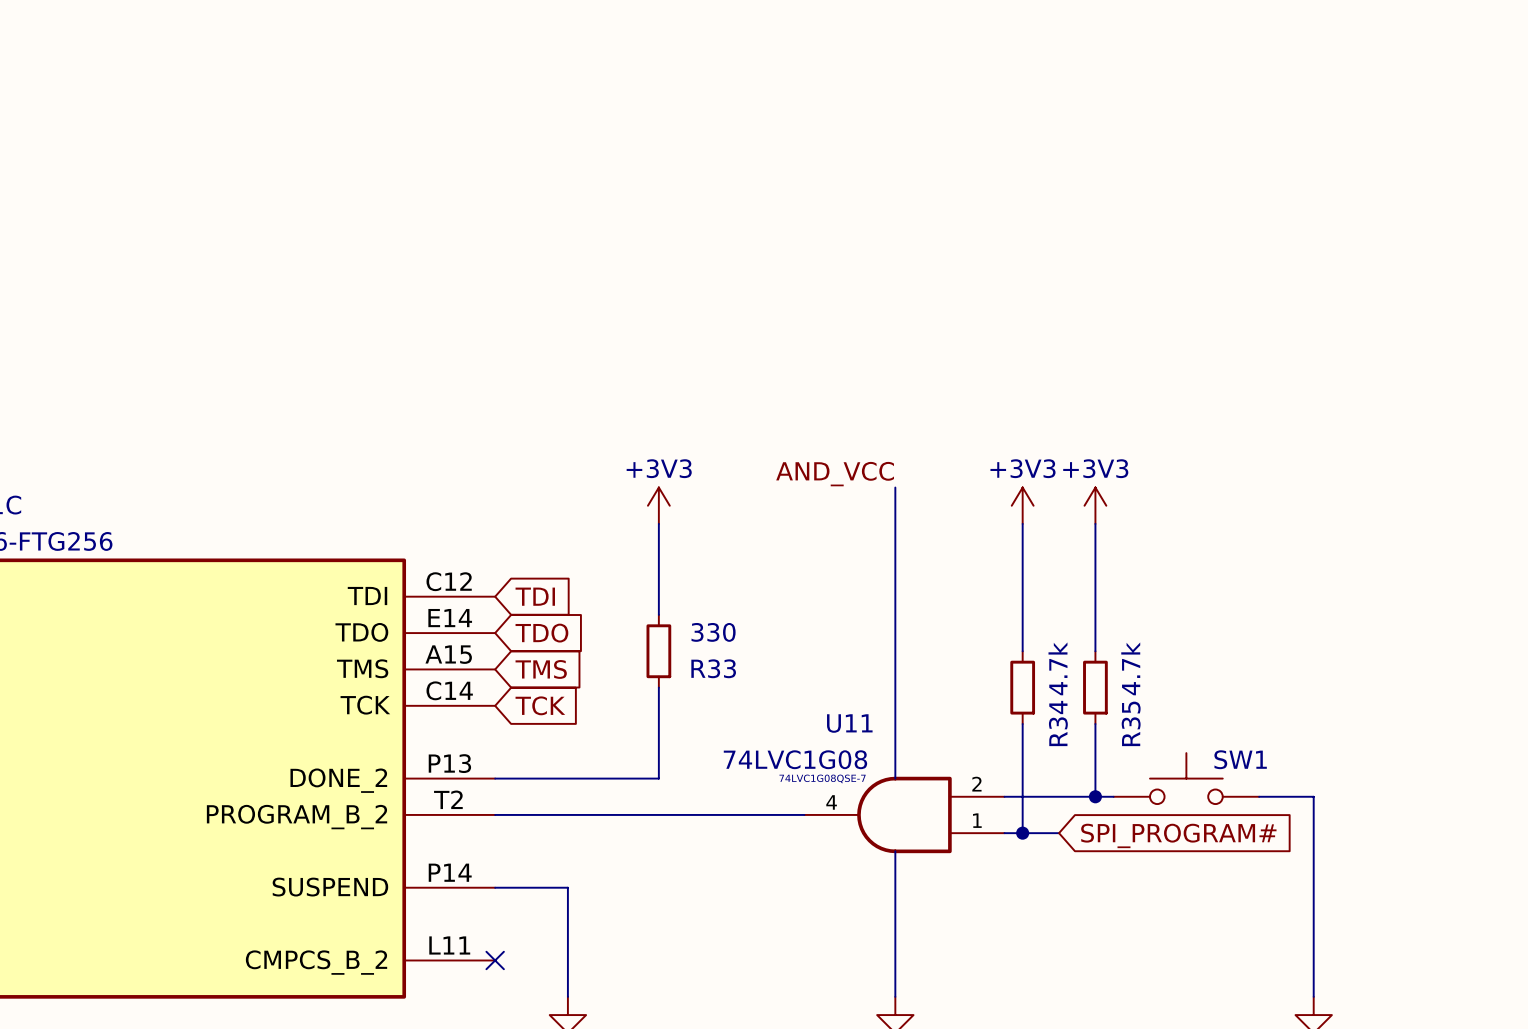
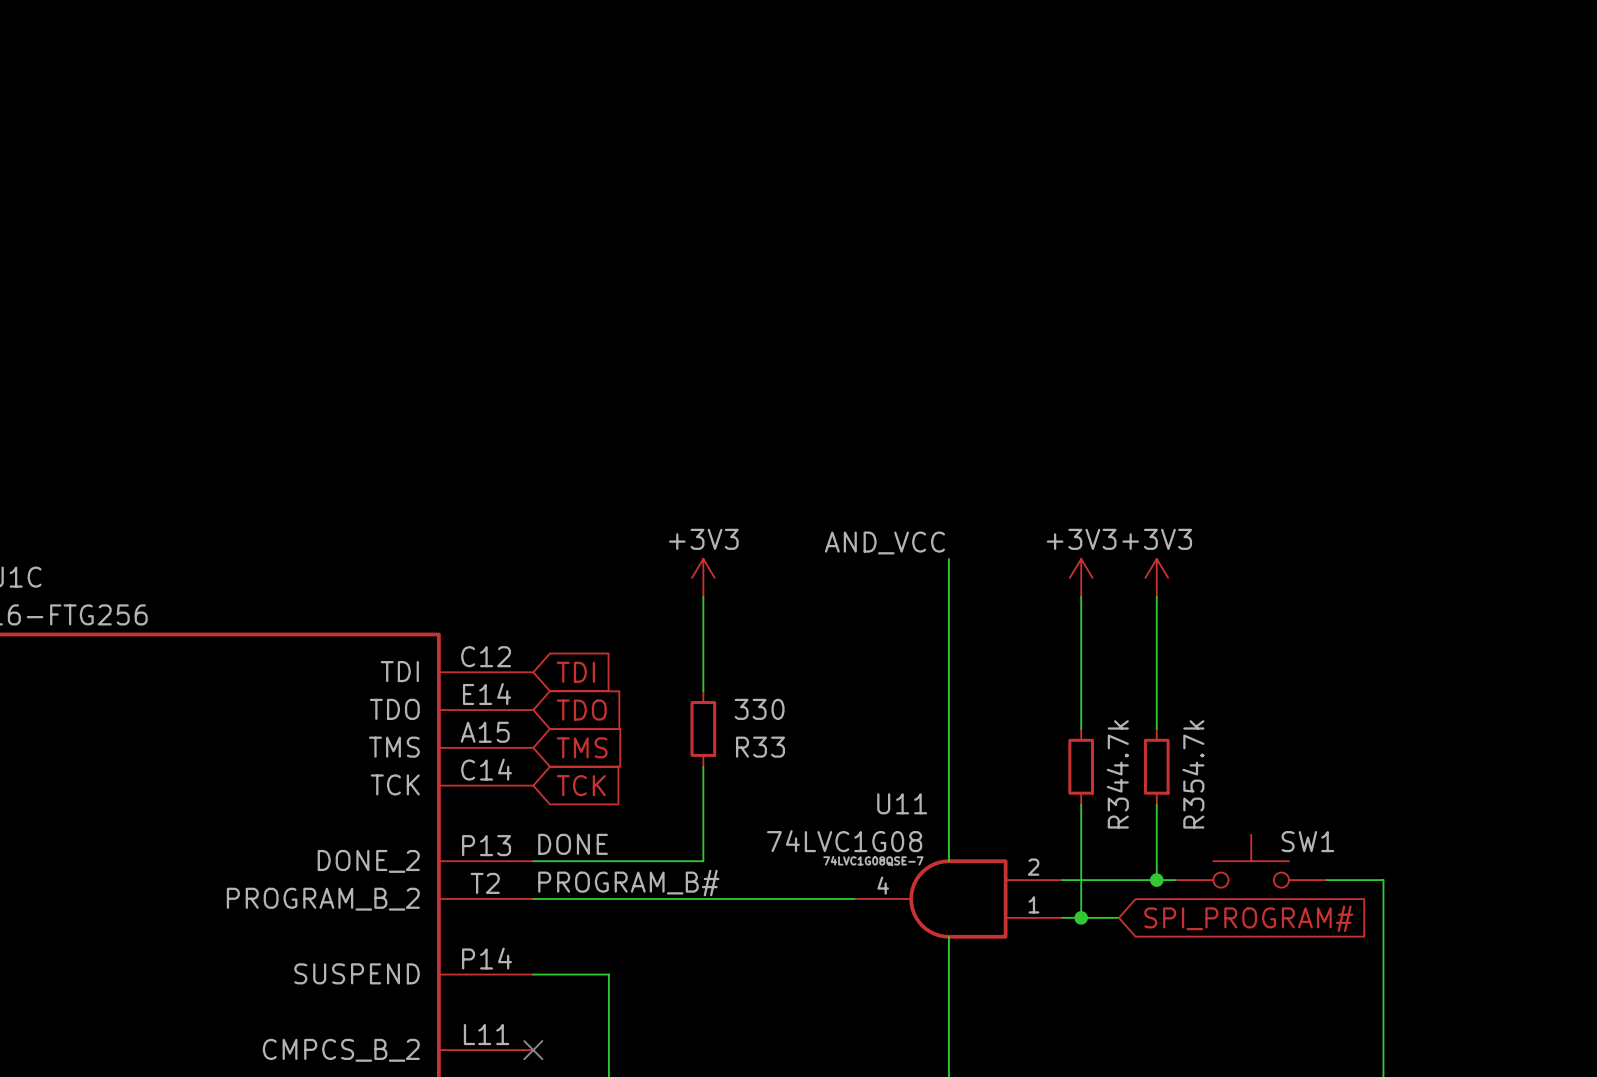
label: none -> DONE (573, 844)
label: none -> PROGRAM_B# (628, 883)

